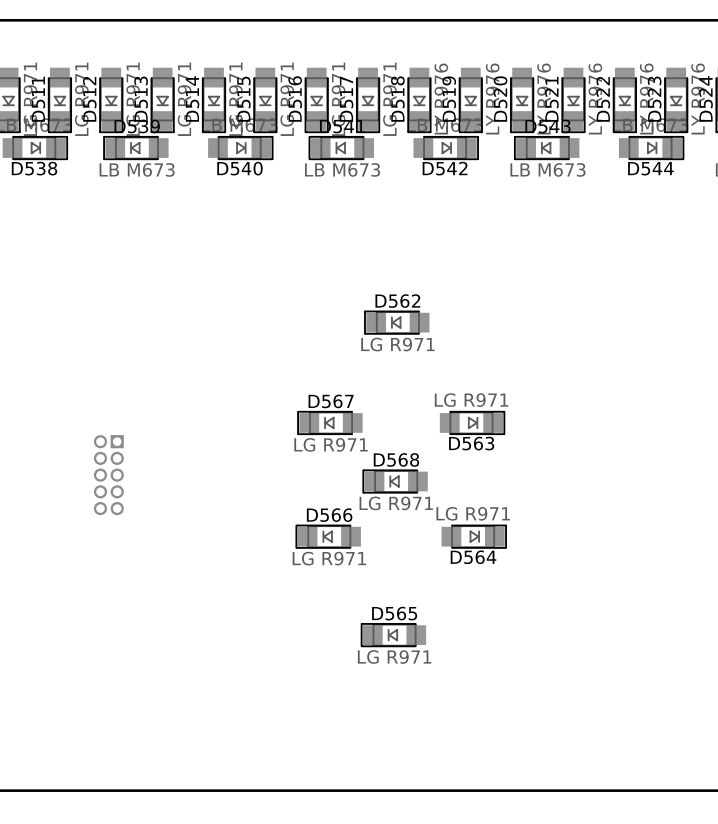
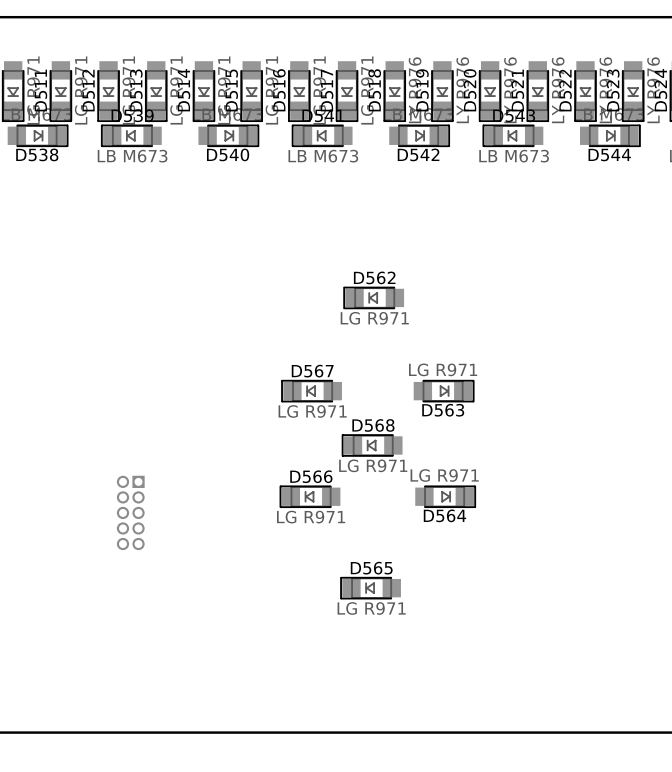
part position: (108, 475) -> (130, 512)

